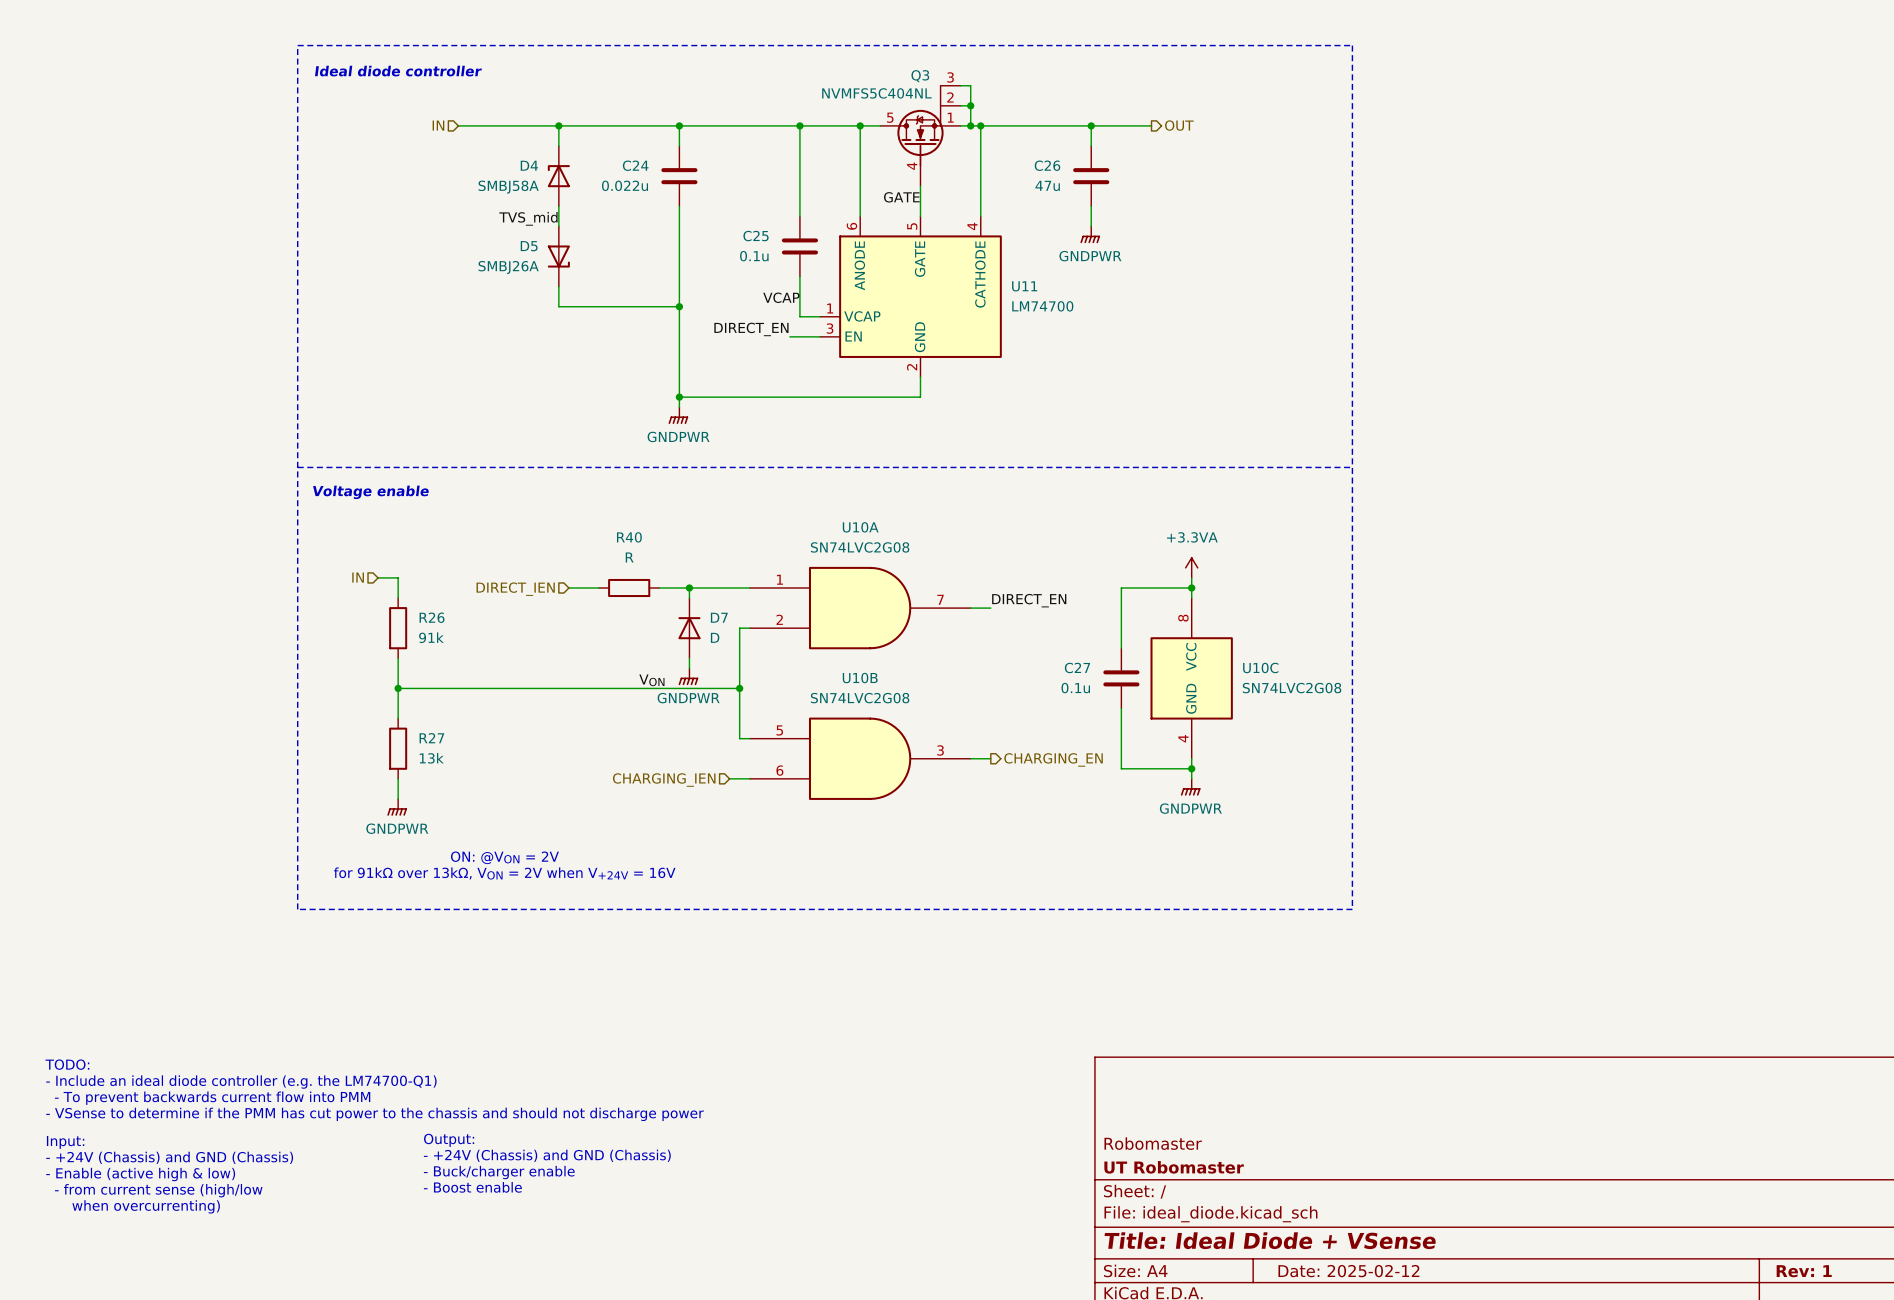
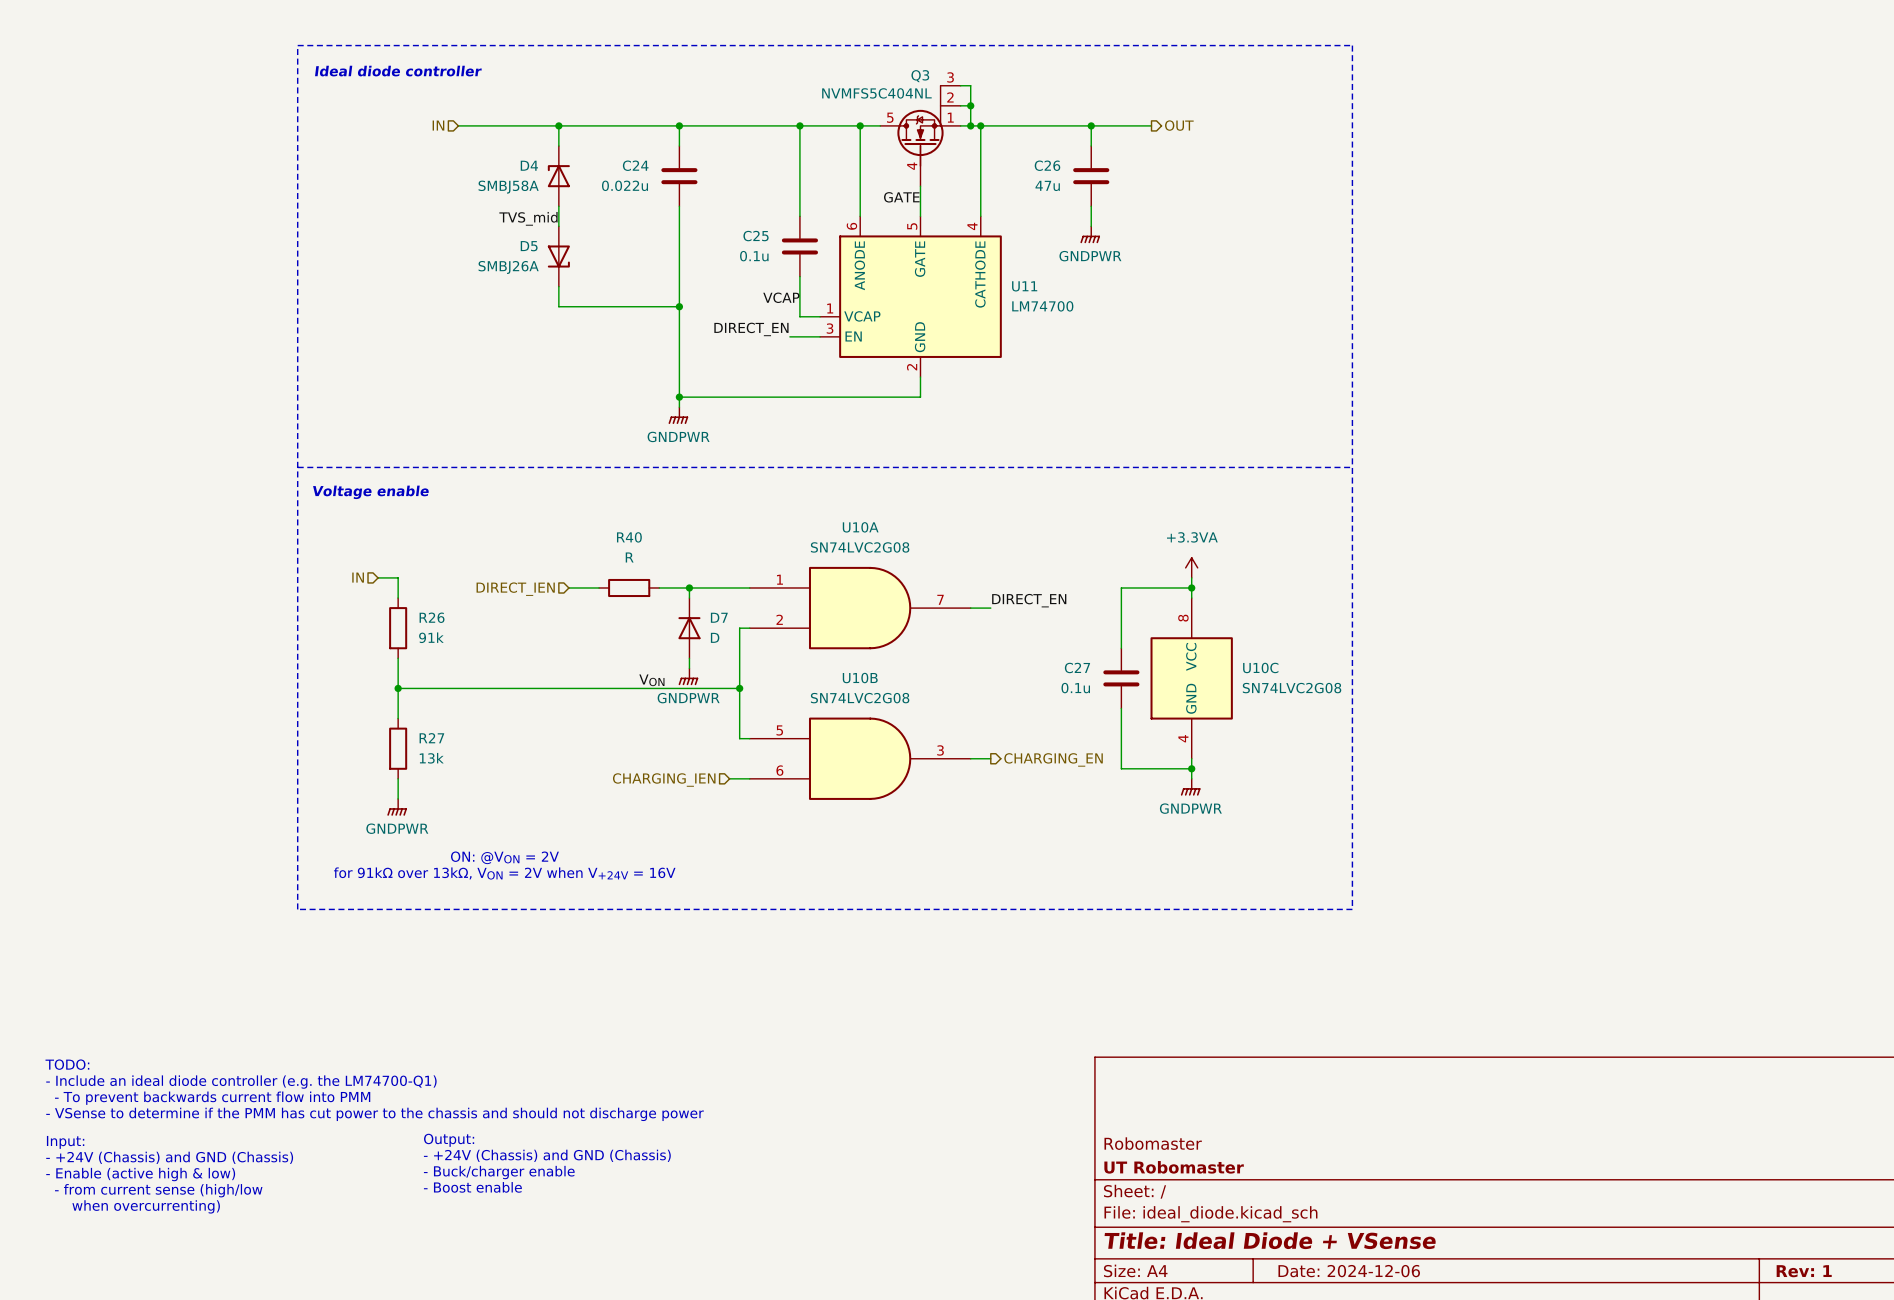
title block: Date: 2025-02-12 (1348, 1271) -> Date: 2024-12-06 (1349, 1271)

